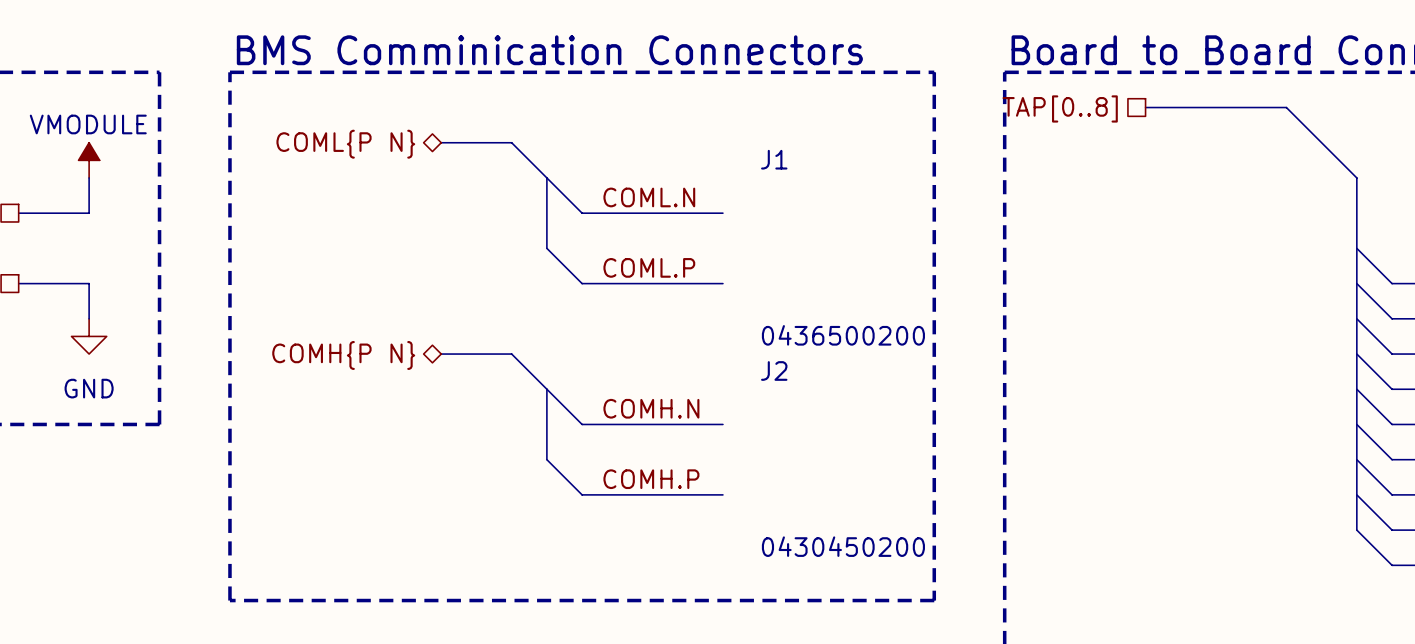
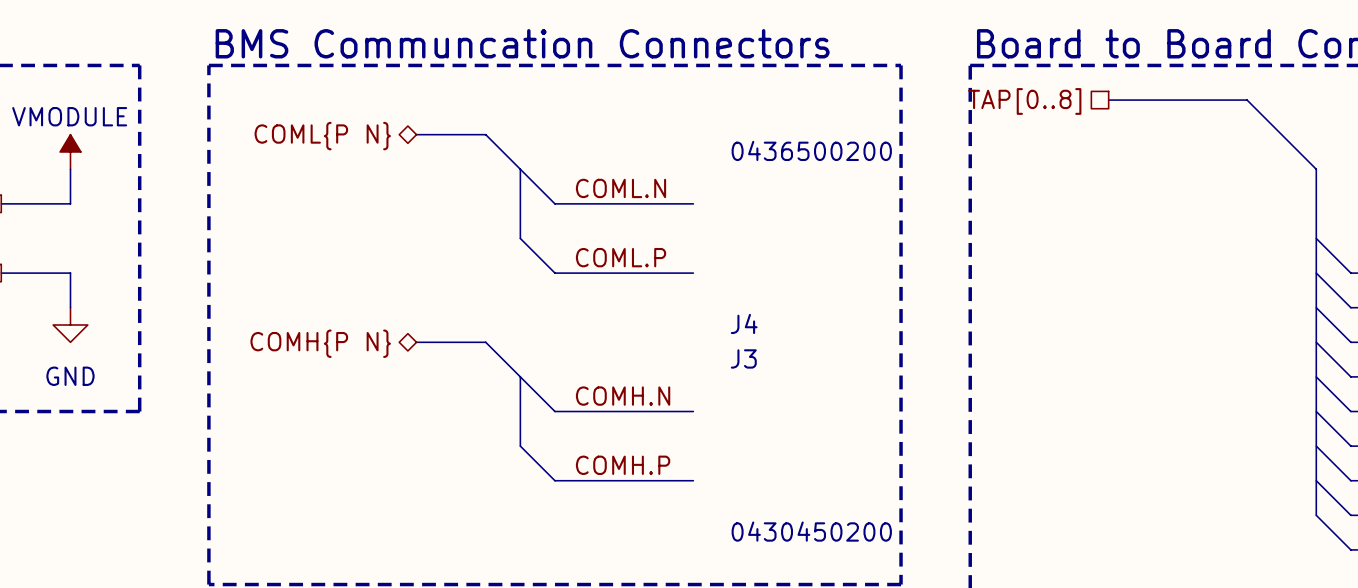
text: BMS Comminication Connectors (549, 50) -> BMS Communcation Connectors (522, 43)
J1 name: J1 (774, 159) -> J4 (744, 323)
J1 value position: 0436500200 (843, 335) -> 0436500200 (811, 150)
J2 name: J2 (774, 370) -> J3 (743, 358)

